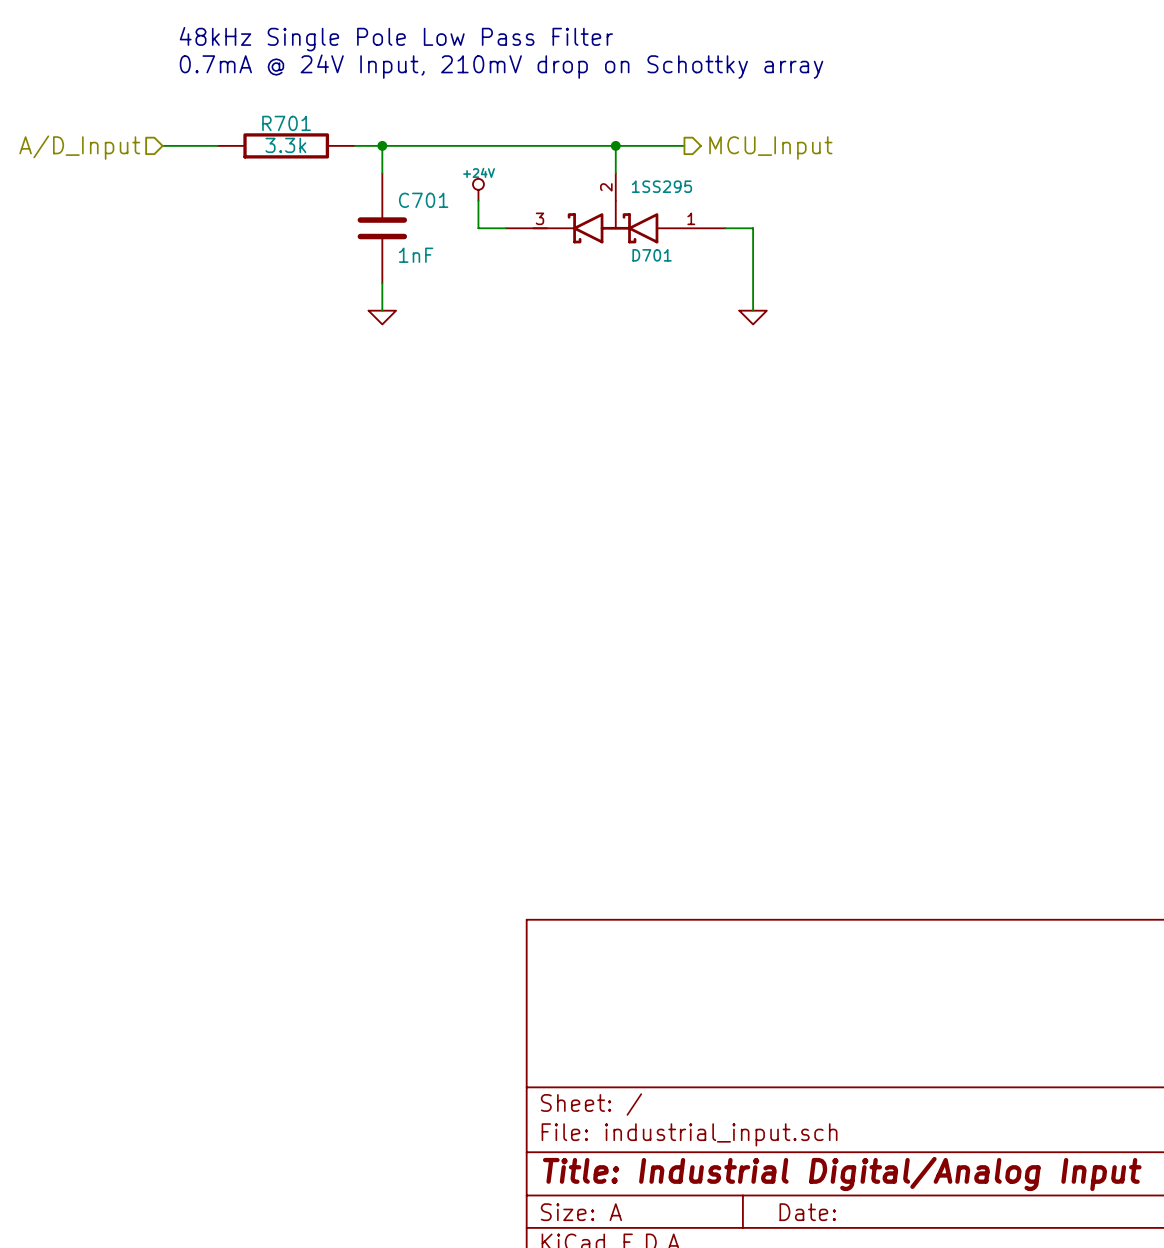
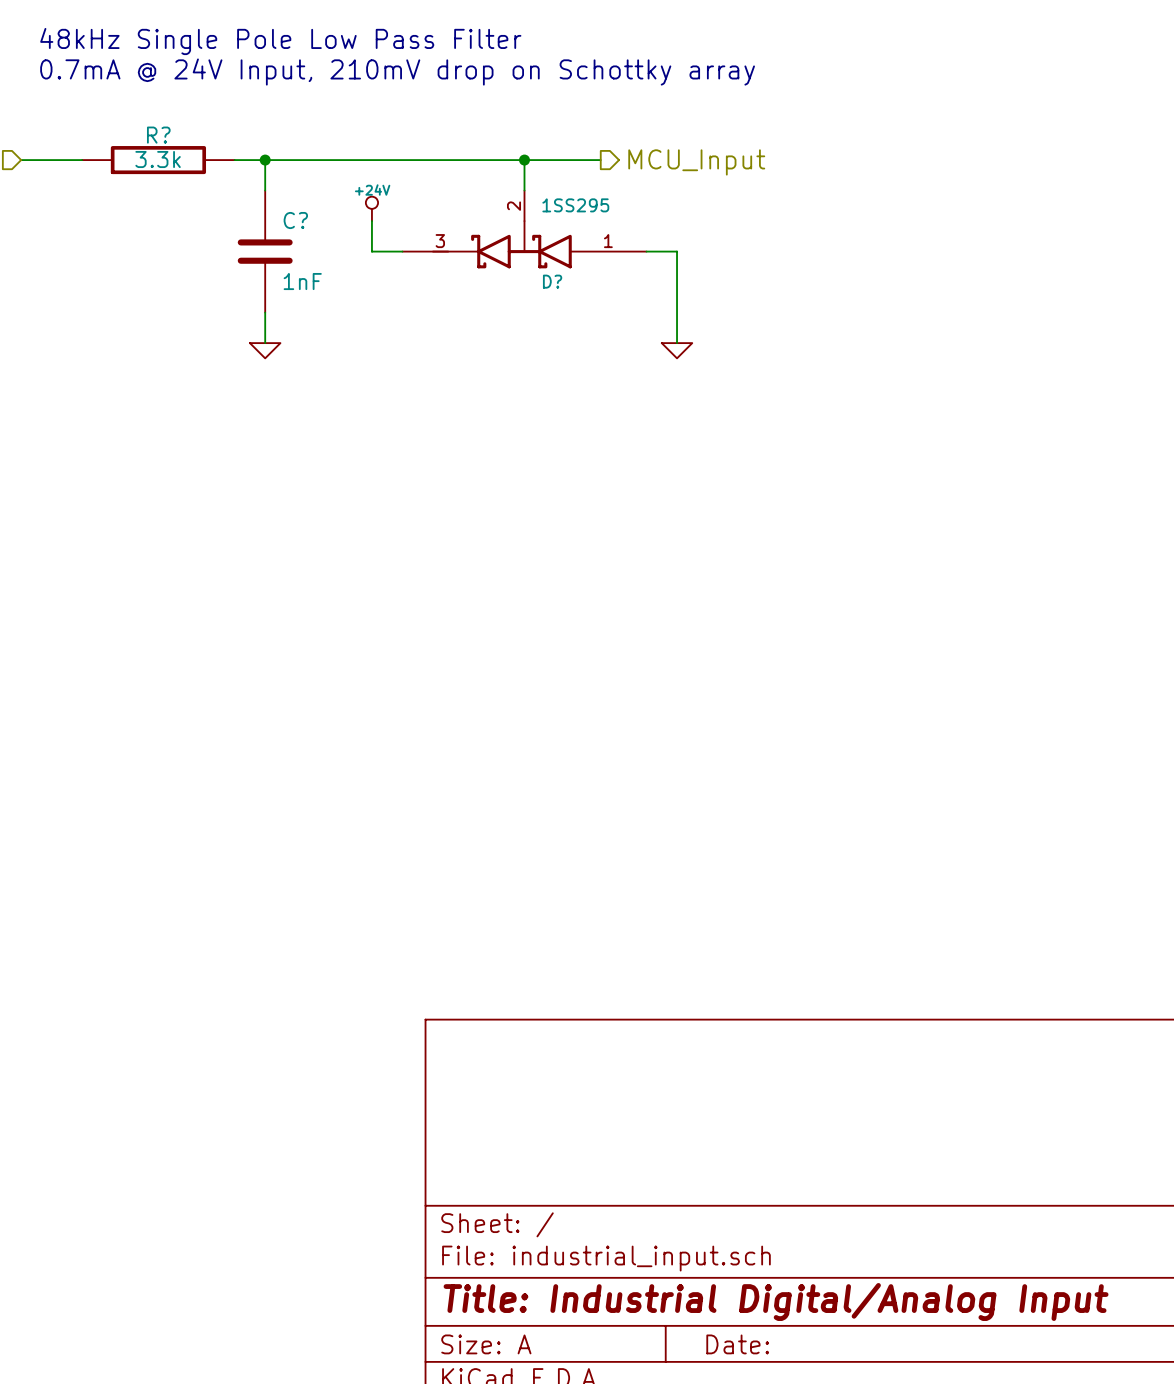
R701 name: R701 (286, 123) -> R? (158, 135)
C701 name: C701 (423, 200) -> C? (295, 220)
D701 name: D701 (652, 255) -> D? (552, 281)

